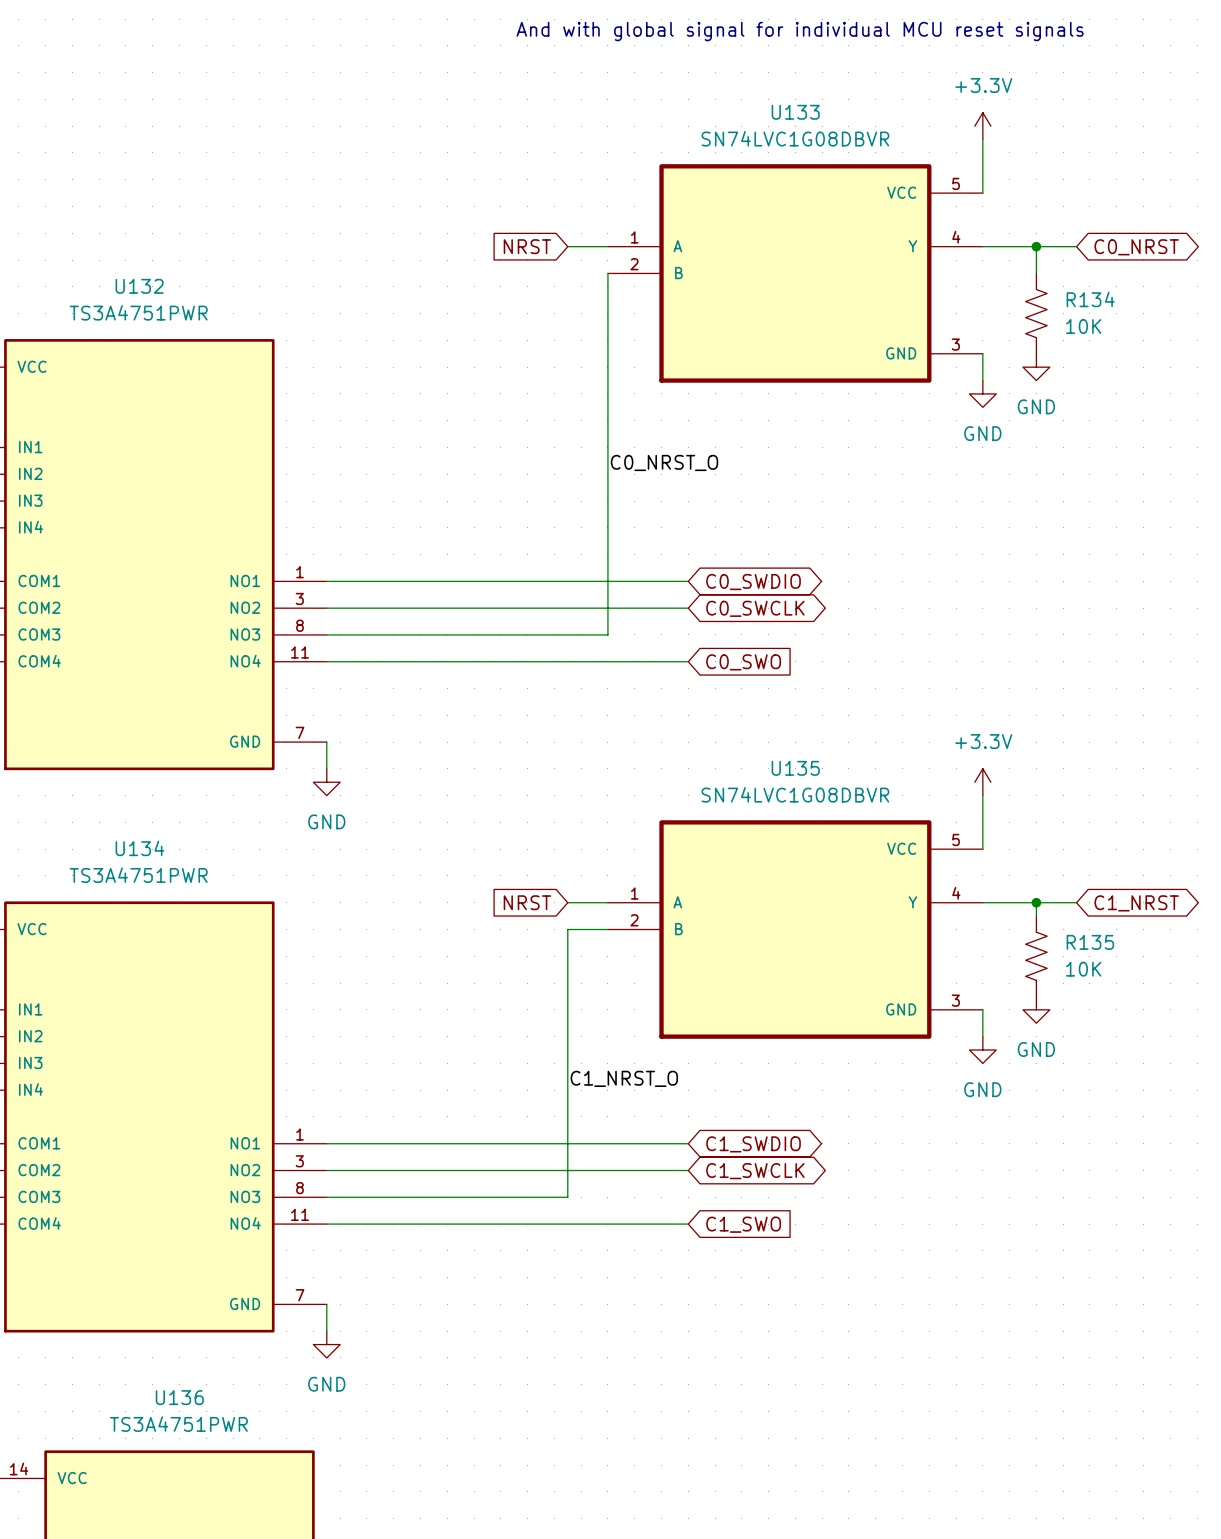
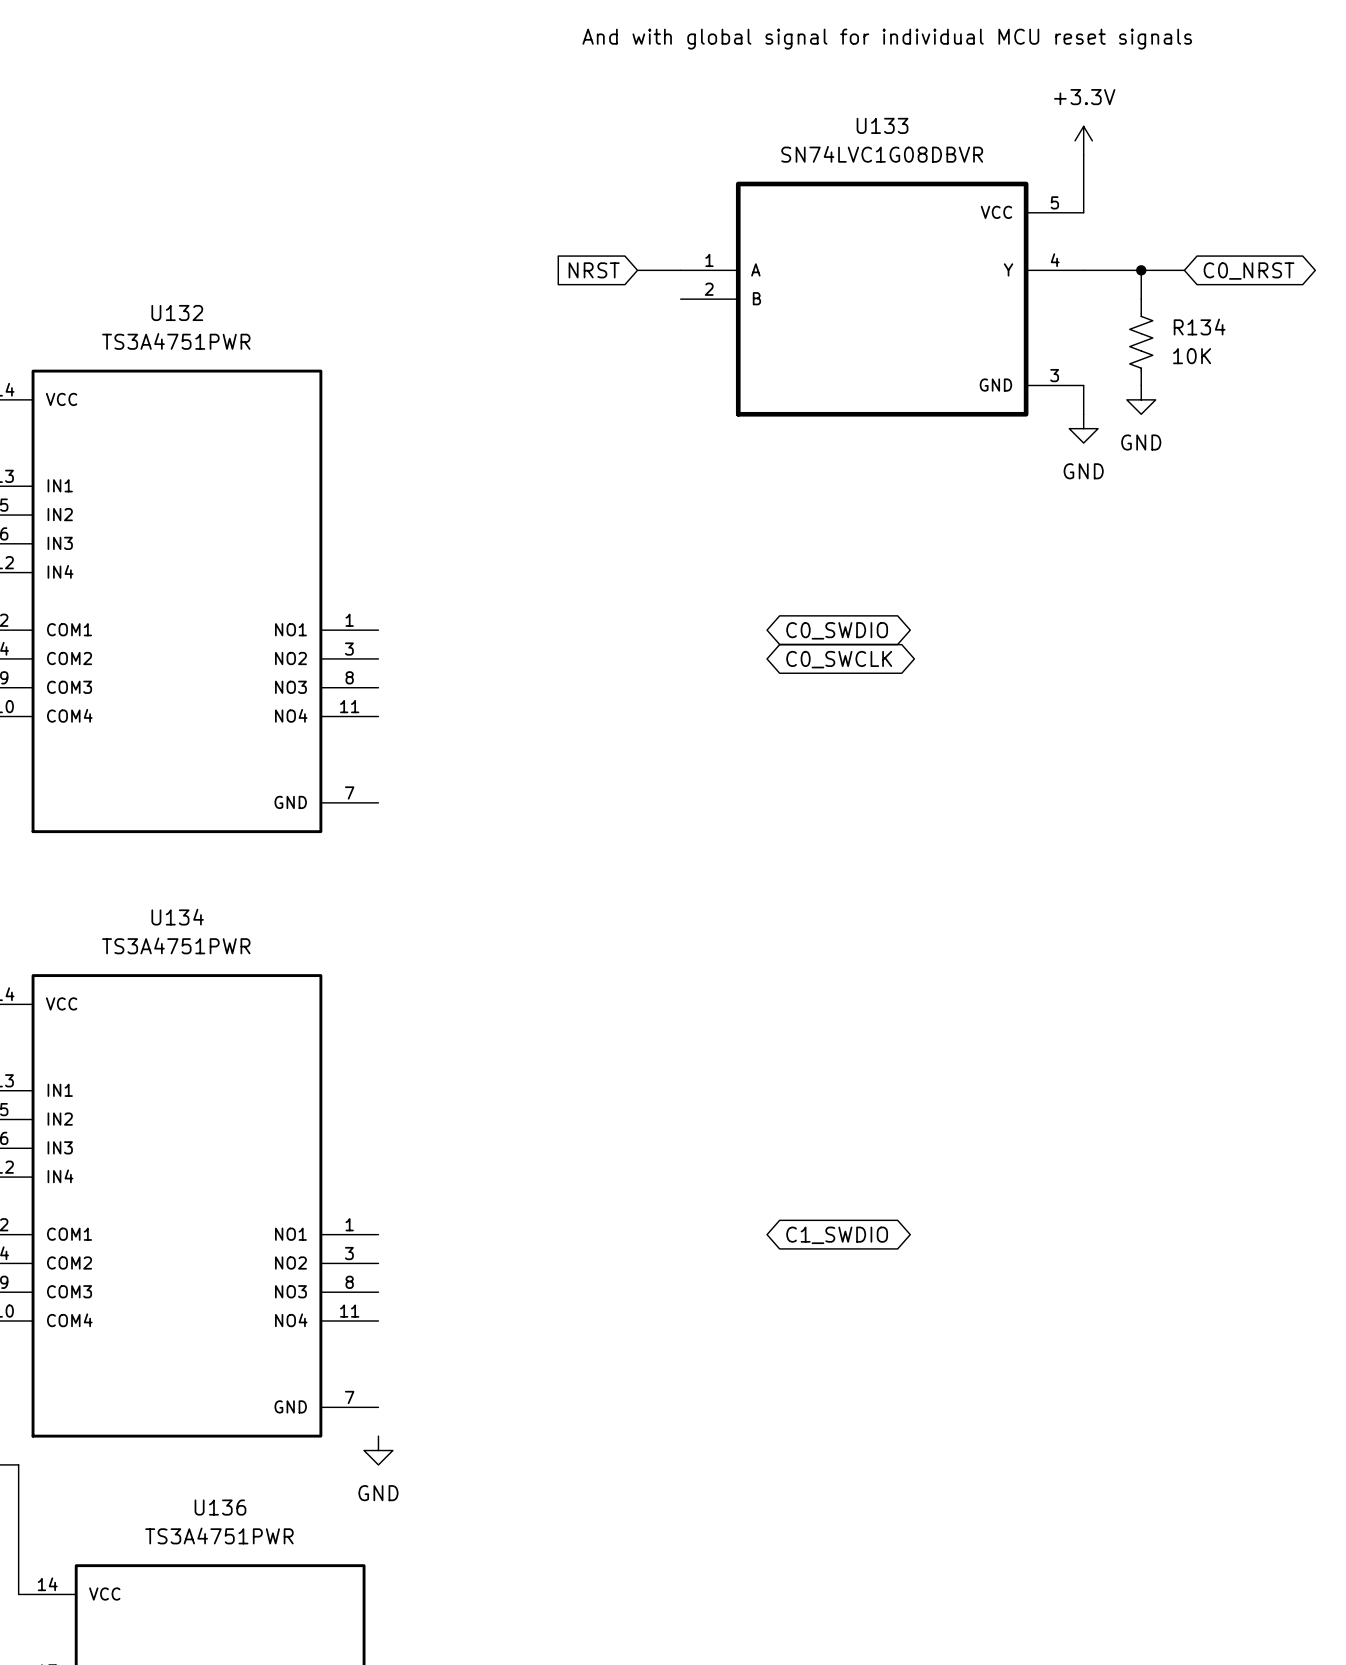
wire: (607, 273) (607, 634) (326, 634) -> none
label: C0_NRST_O (664, 462) -> none
wire: (326, 581) (688, 581) -> none
wire: (326, 608) (688, 608) -> none
wire: (326, 661) (688, 661) -> none
global label: C0_SWO (743, 662) -> none
wire: (326, 742) (326, 768) -> none
power symbol: GND (326, 782) -> none
power symbol: +3.3V (982, 782) -> none
wire: (982, 795) (982, 849) -> none
global label: NRST (527, 902) -> none
wire: (567, 902) (607, 902) -> none
wire: (982, 902) (1076, 902) -> none
wire: (1036, 902) (1036, 916) -> none
junction: (1036, 902) -> none
global label: C1_NRST (1136, 903) -> none
wire: (607, 929) (567, 929) (567, 1197) (326, 1197) -> none
U135: SN74LVC1G08DBVR (795, 929) -> none
R135: 10K (1036, 956) -> none
wire: (982, 1009) (982, 1036) -> none
power symbol: GND (1036, 1009) -> none
power symbol: GND (982, 1050) -> none
label: C1_NRST_O (624, 1078) -> none
wire: (326, 1143) (688, 1143) -> none
wire: (326, 1170) (688, 1170) -> none
global label: C1_SWCLK (755, 1171) -> none
wire: (326, 1224) (688, 1224) -> none
global label: C1_SWO (743, 1224) -> none
wire: (326, 1304) (326, 1331) -> none

